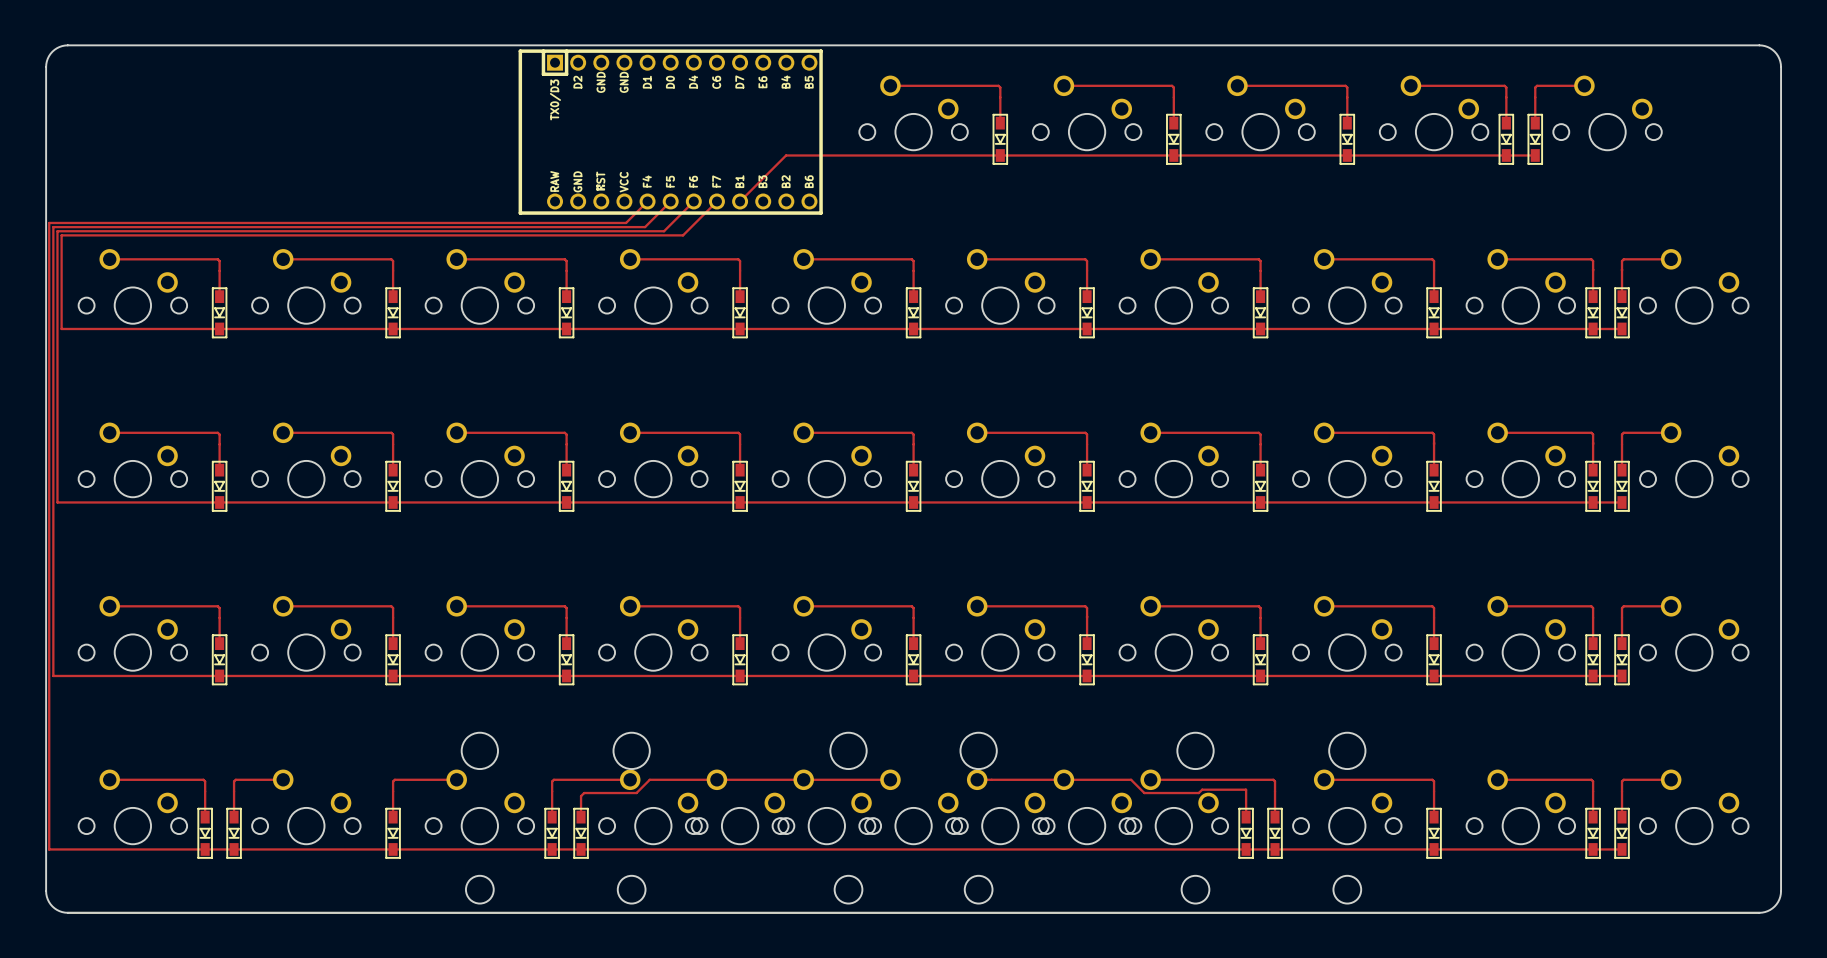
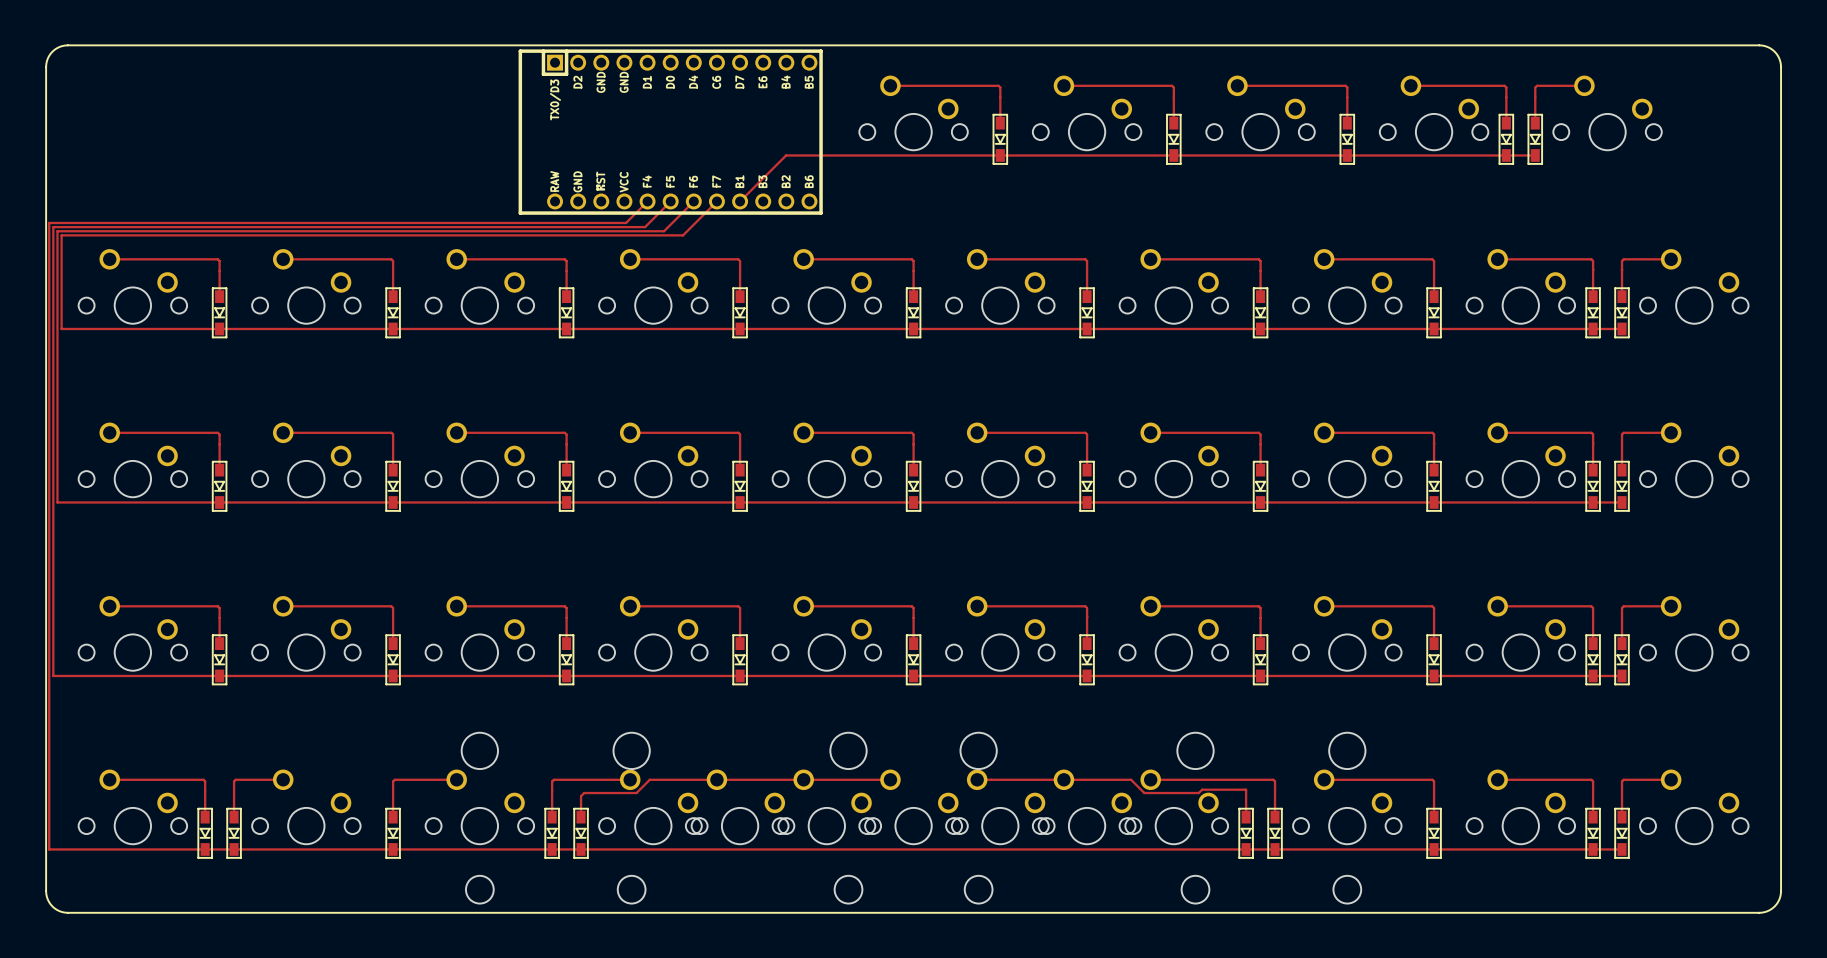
board edge: (1759, 45) (67, 45) (56, 48) (49, 56) (46, 67) (46, 891) (47, 899) (52, 906) (59, 911) (67, 912) -> none
board edge: (1759, 45) (1767, 47) (1774, 51) (1779, 58) (1781, 67) (1781, 891) (1778, 901) (1770, 909) (1759, 912) (67, 912) -> none
line: none -> (1759, 45) (67, 45) (56, 48) (49, 56) (46, 67) (46, 891) (47, 899) (52, 906) (59, 911) (67, 912)
line: none -> (1759, 45) (1767, 47) (1774, 51) (1779, 58) (1781, 67) (1781, 891) (1779, 899) (1774, 906) (1767, 911) (1759, 912)

